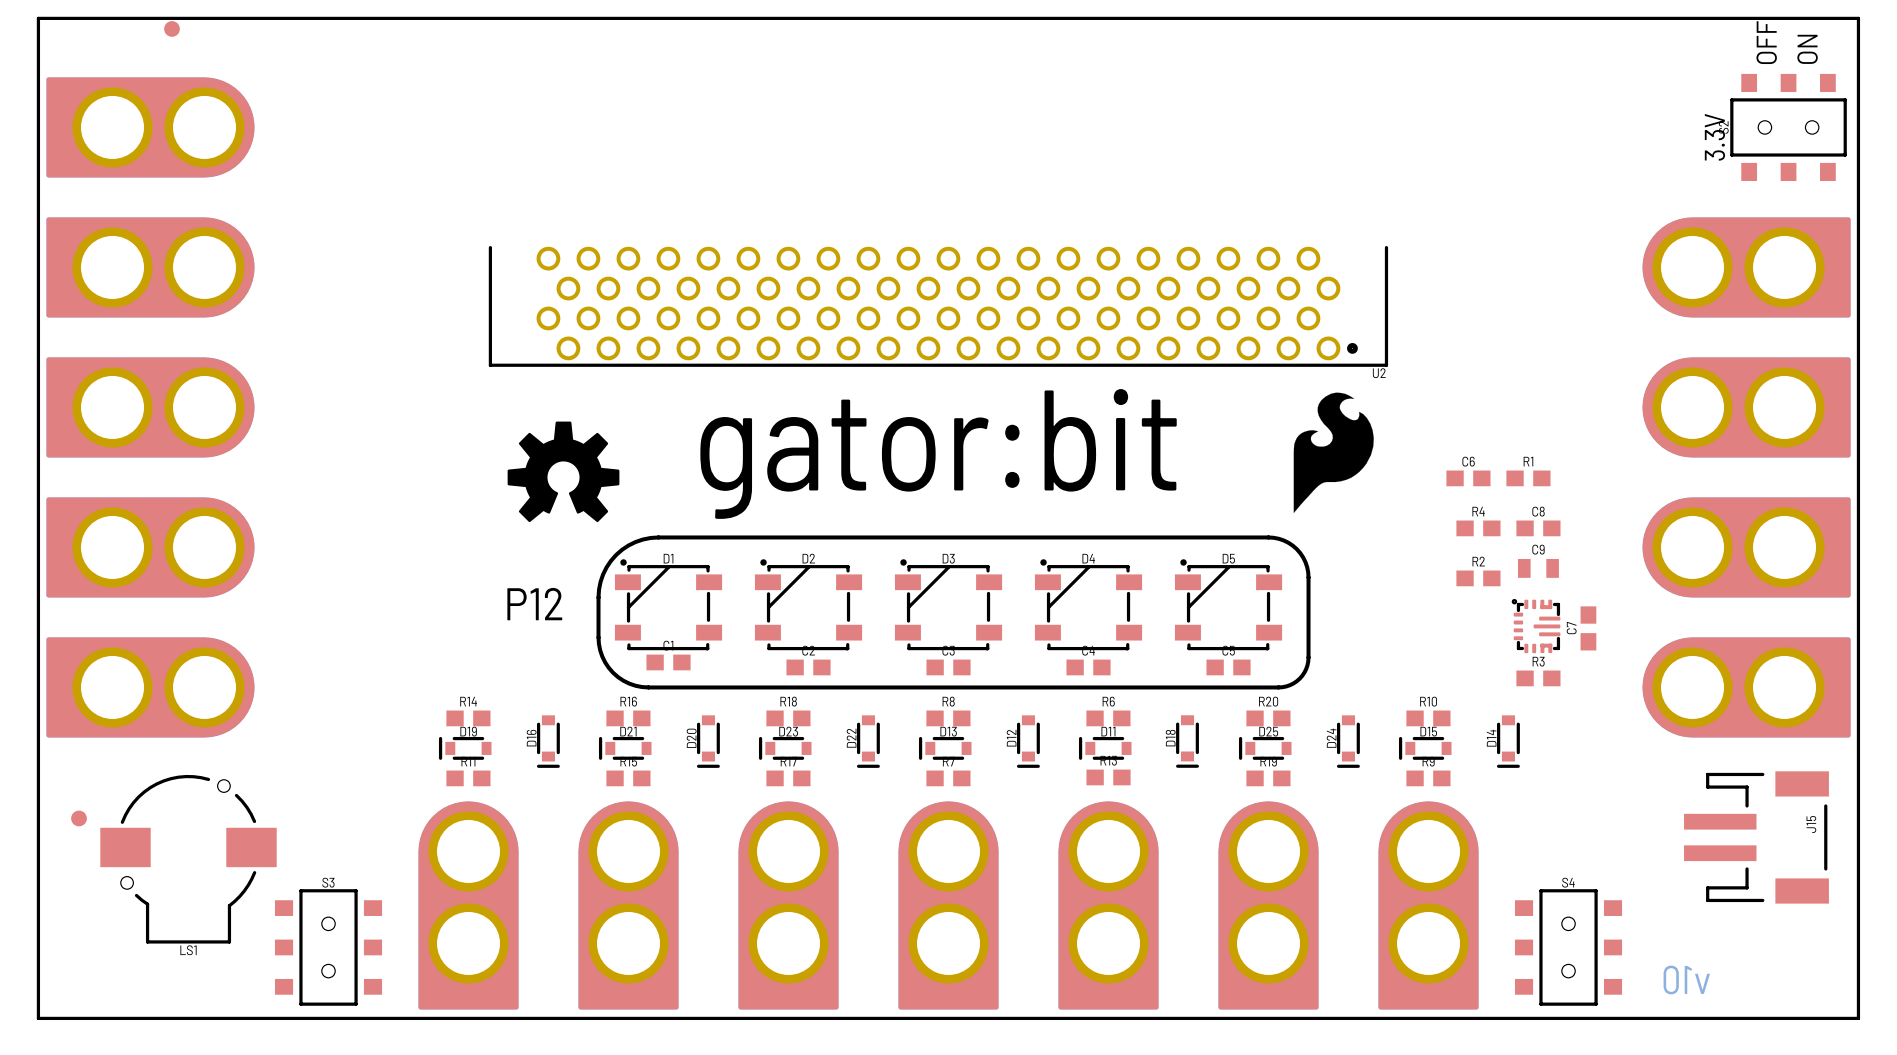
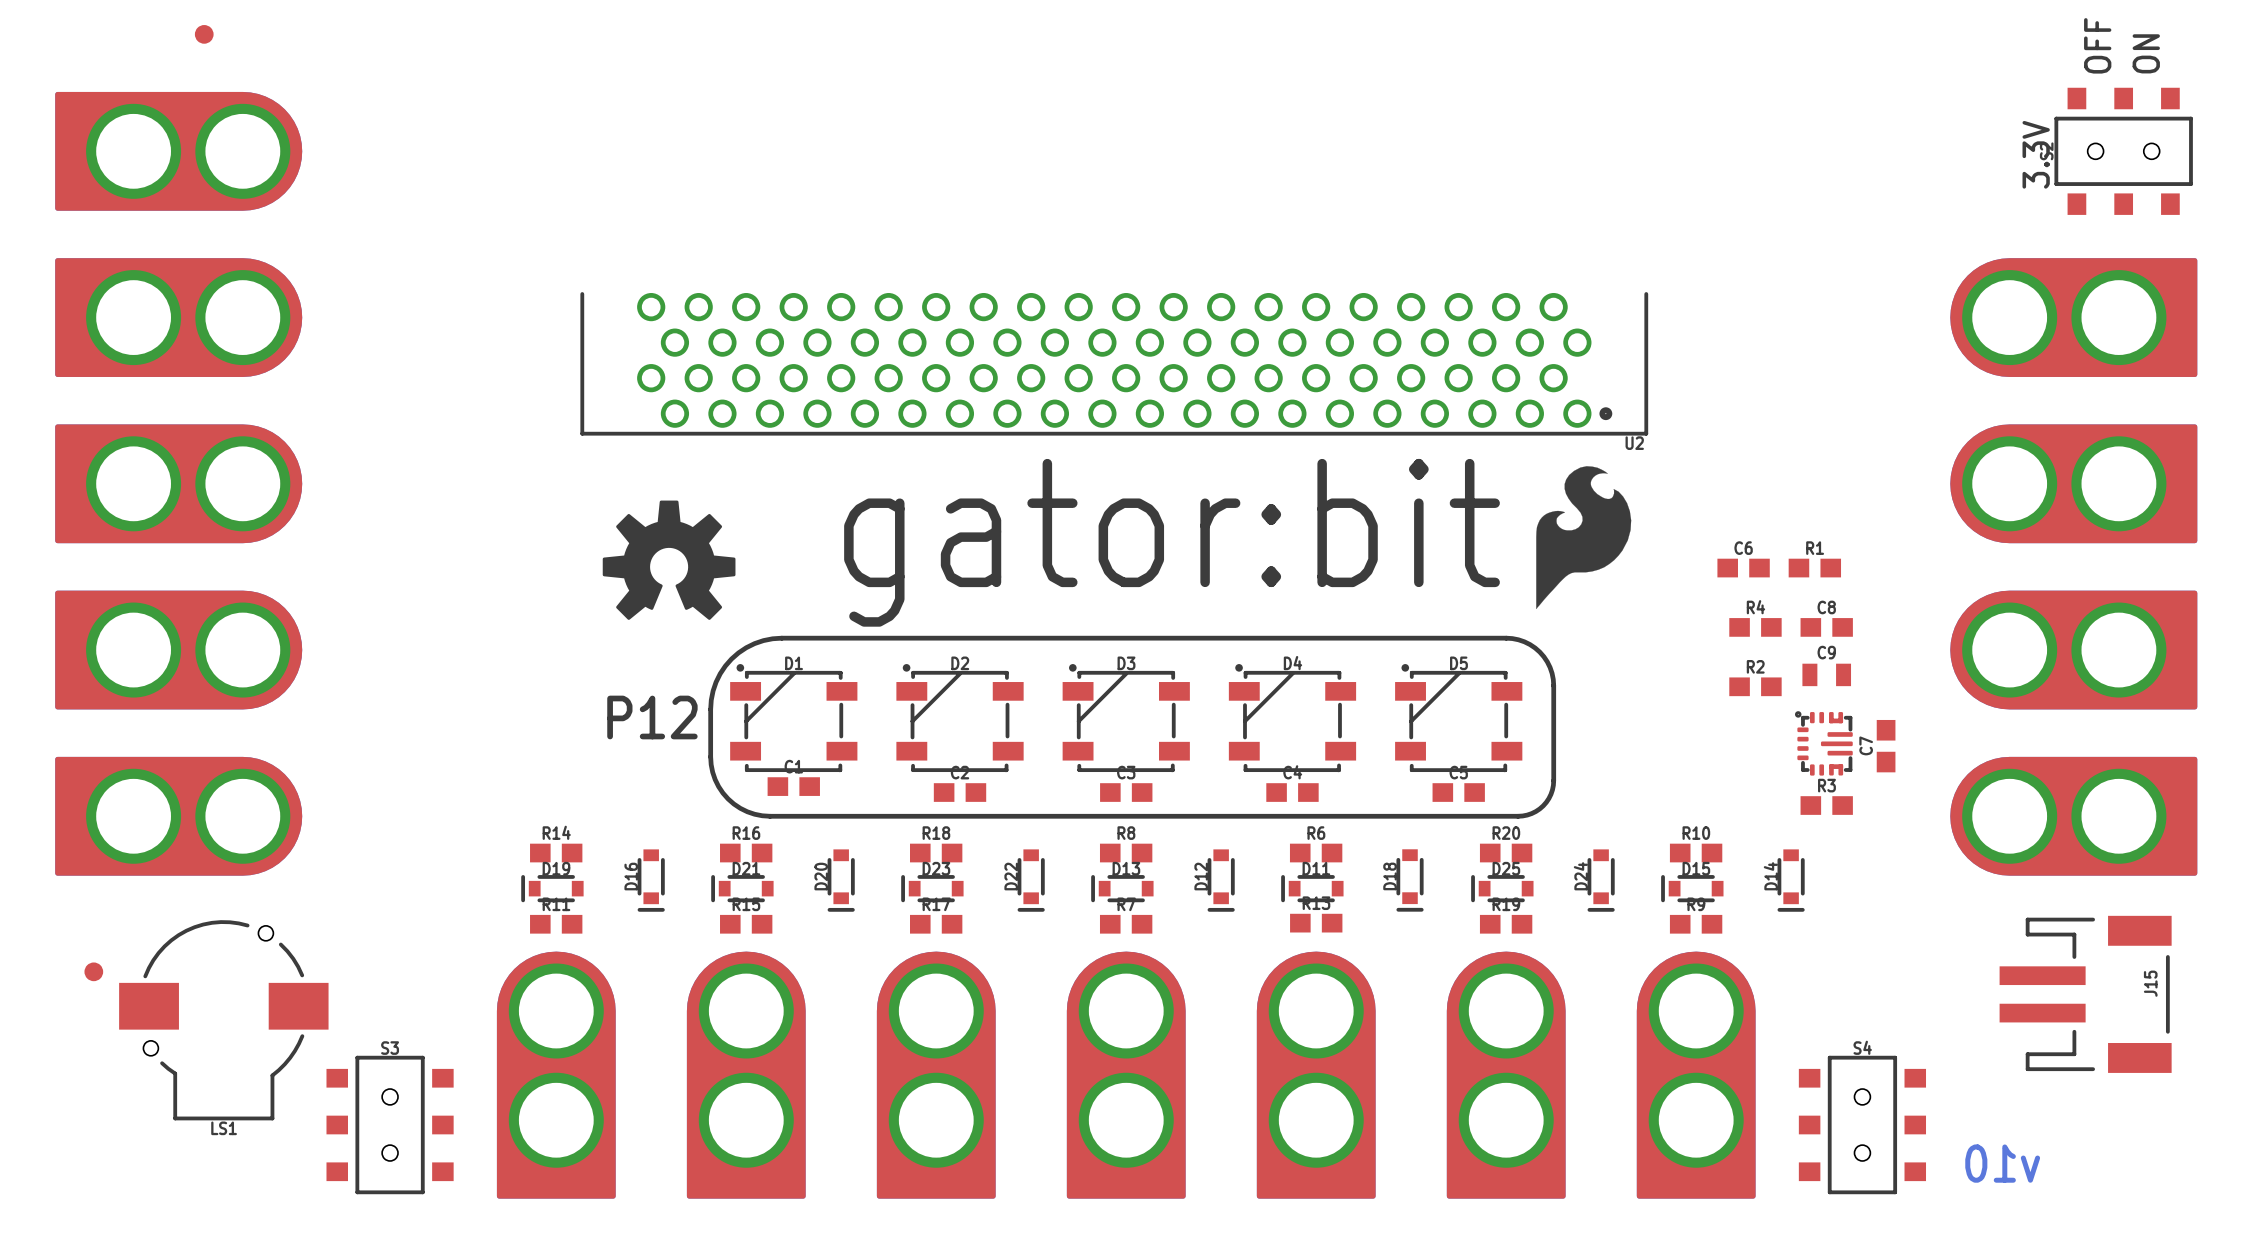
board edge: (38, 18) (1858, 18) (1858, 1018) (38, 1018) (38, 18) -> none

